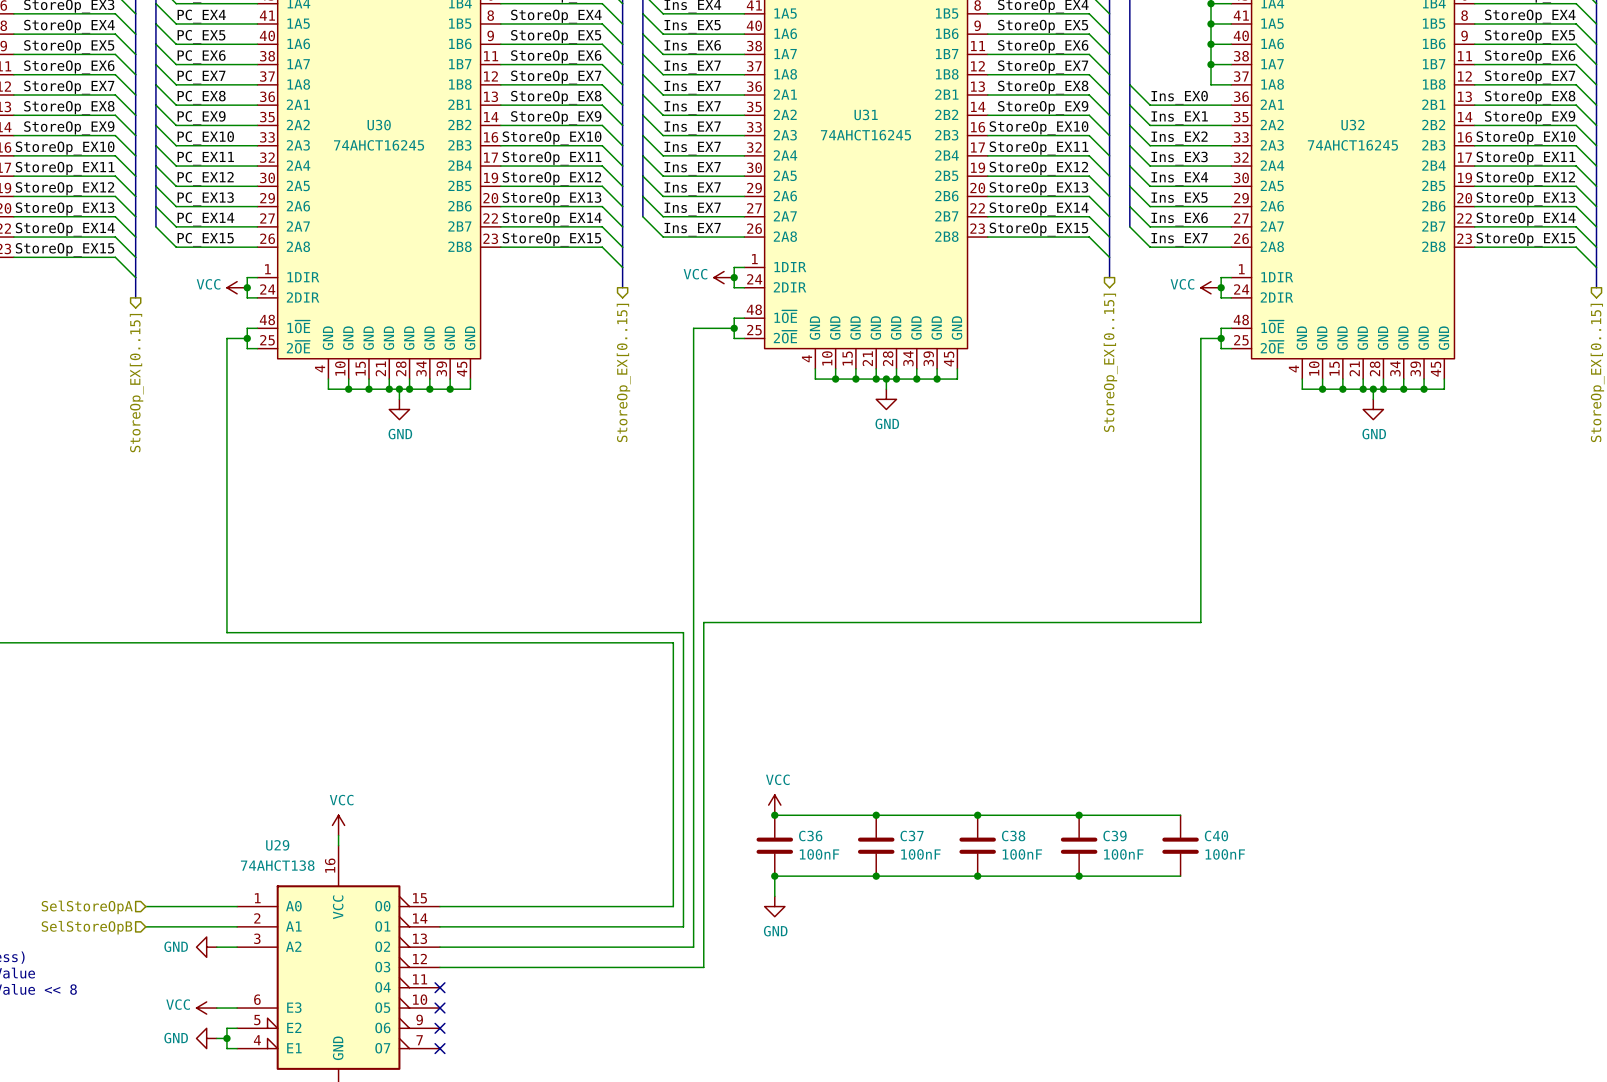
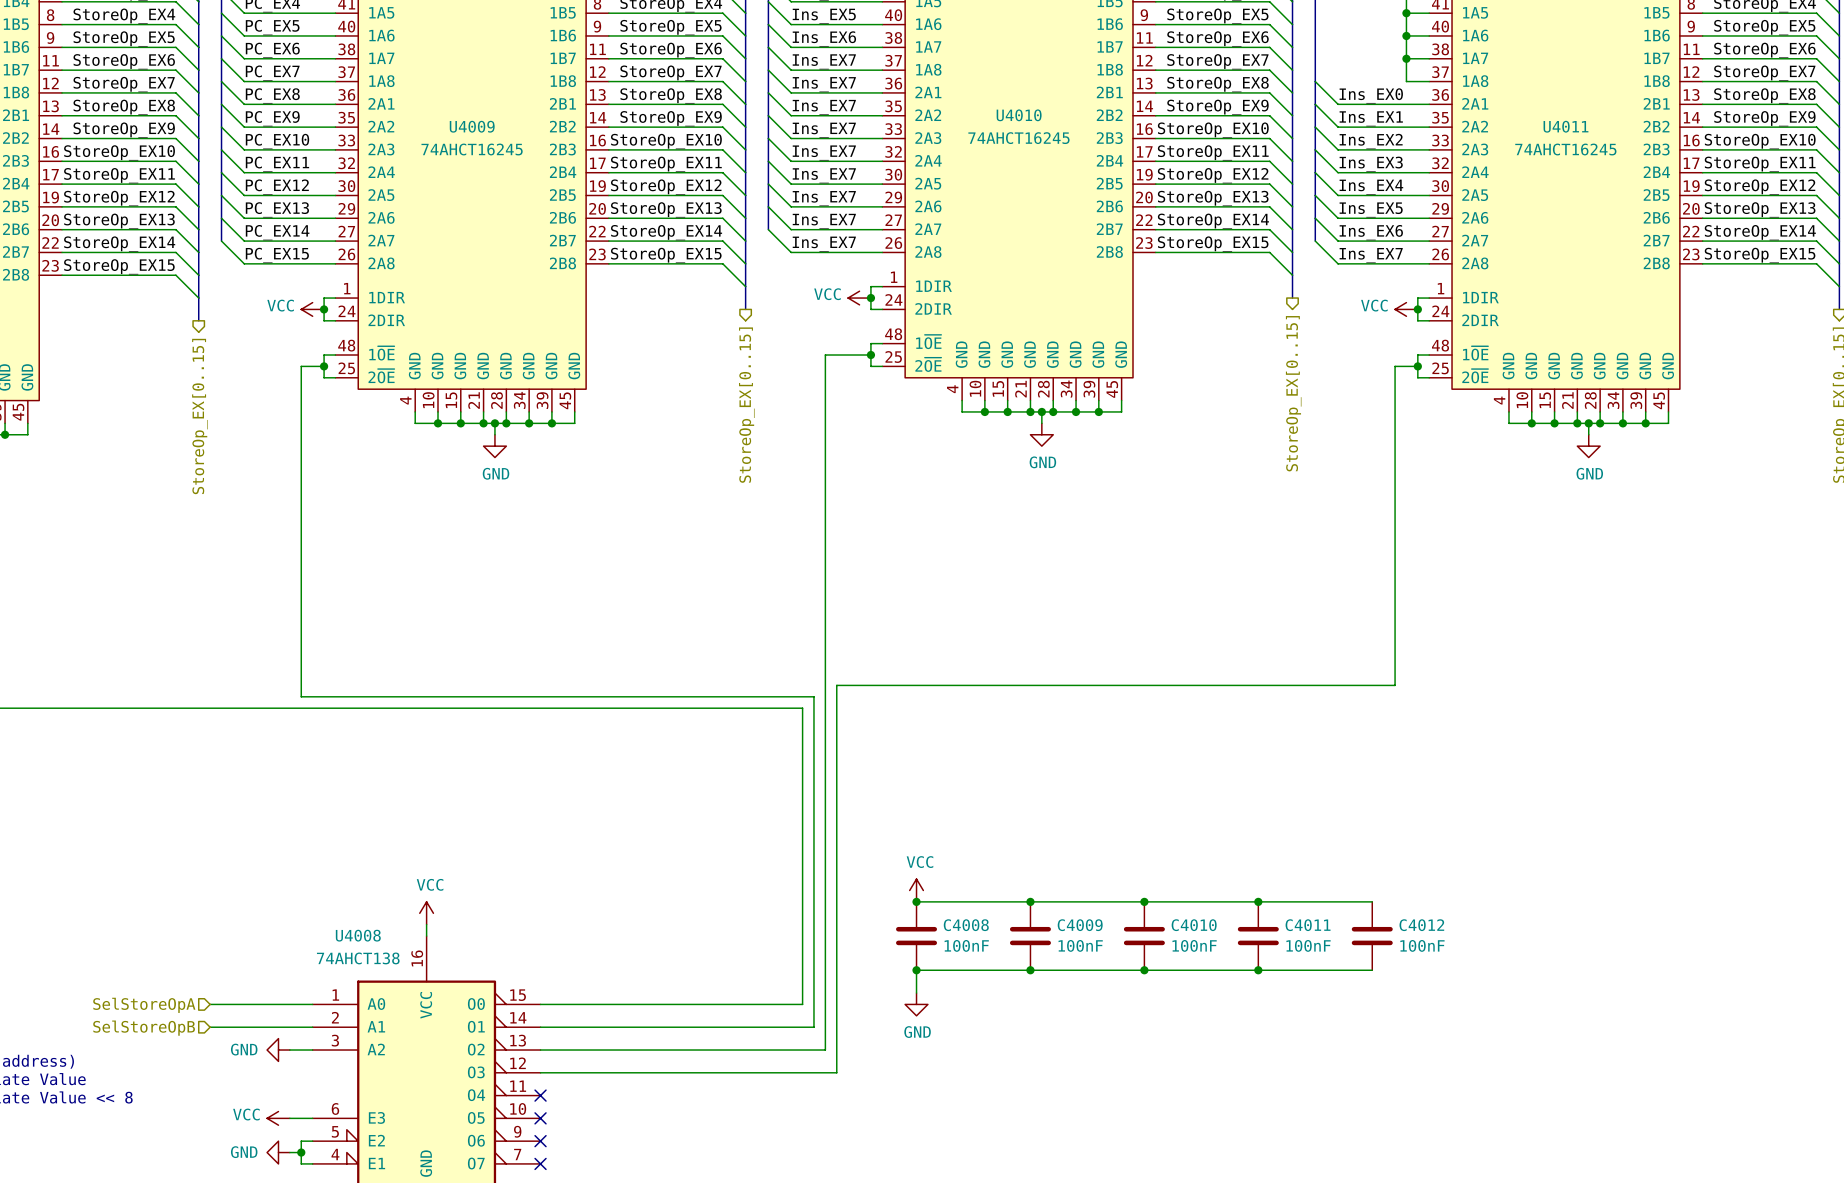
U31 name: U31 (866, 114) -> U4010 (1019, 115)
U30 name: U30 (379, 125) -> U4009 (472, 126)
U32 name: U32 (1352, 125) -> U4011 (1565, 126)
C36 name: C36 (810, 836) -> C4008 (966, 925)
C37 name: C37 (912, 836) -> C4009 (1080, 925)
C38 name: C38 (1013, 836) -> C4010 (1194, 925)
C39 name: C39 (1115, 836) -> C4011 (1308, 925)
C40 name: C40 (1216, 836) -> C4012 (1421, 925)
U29 name: U29 (277, 845) -> U4008 (358, 935)

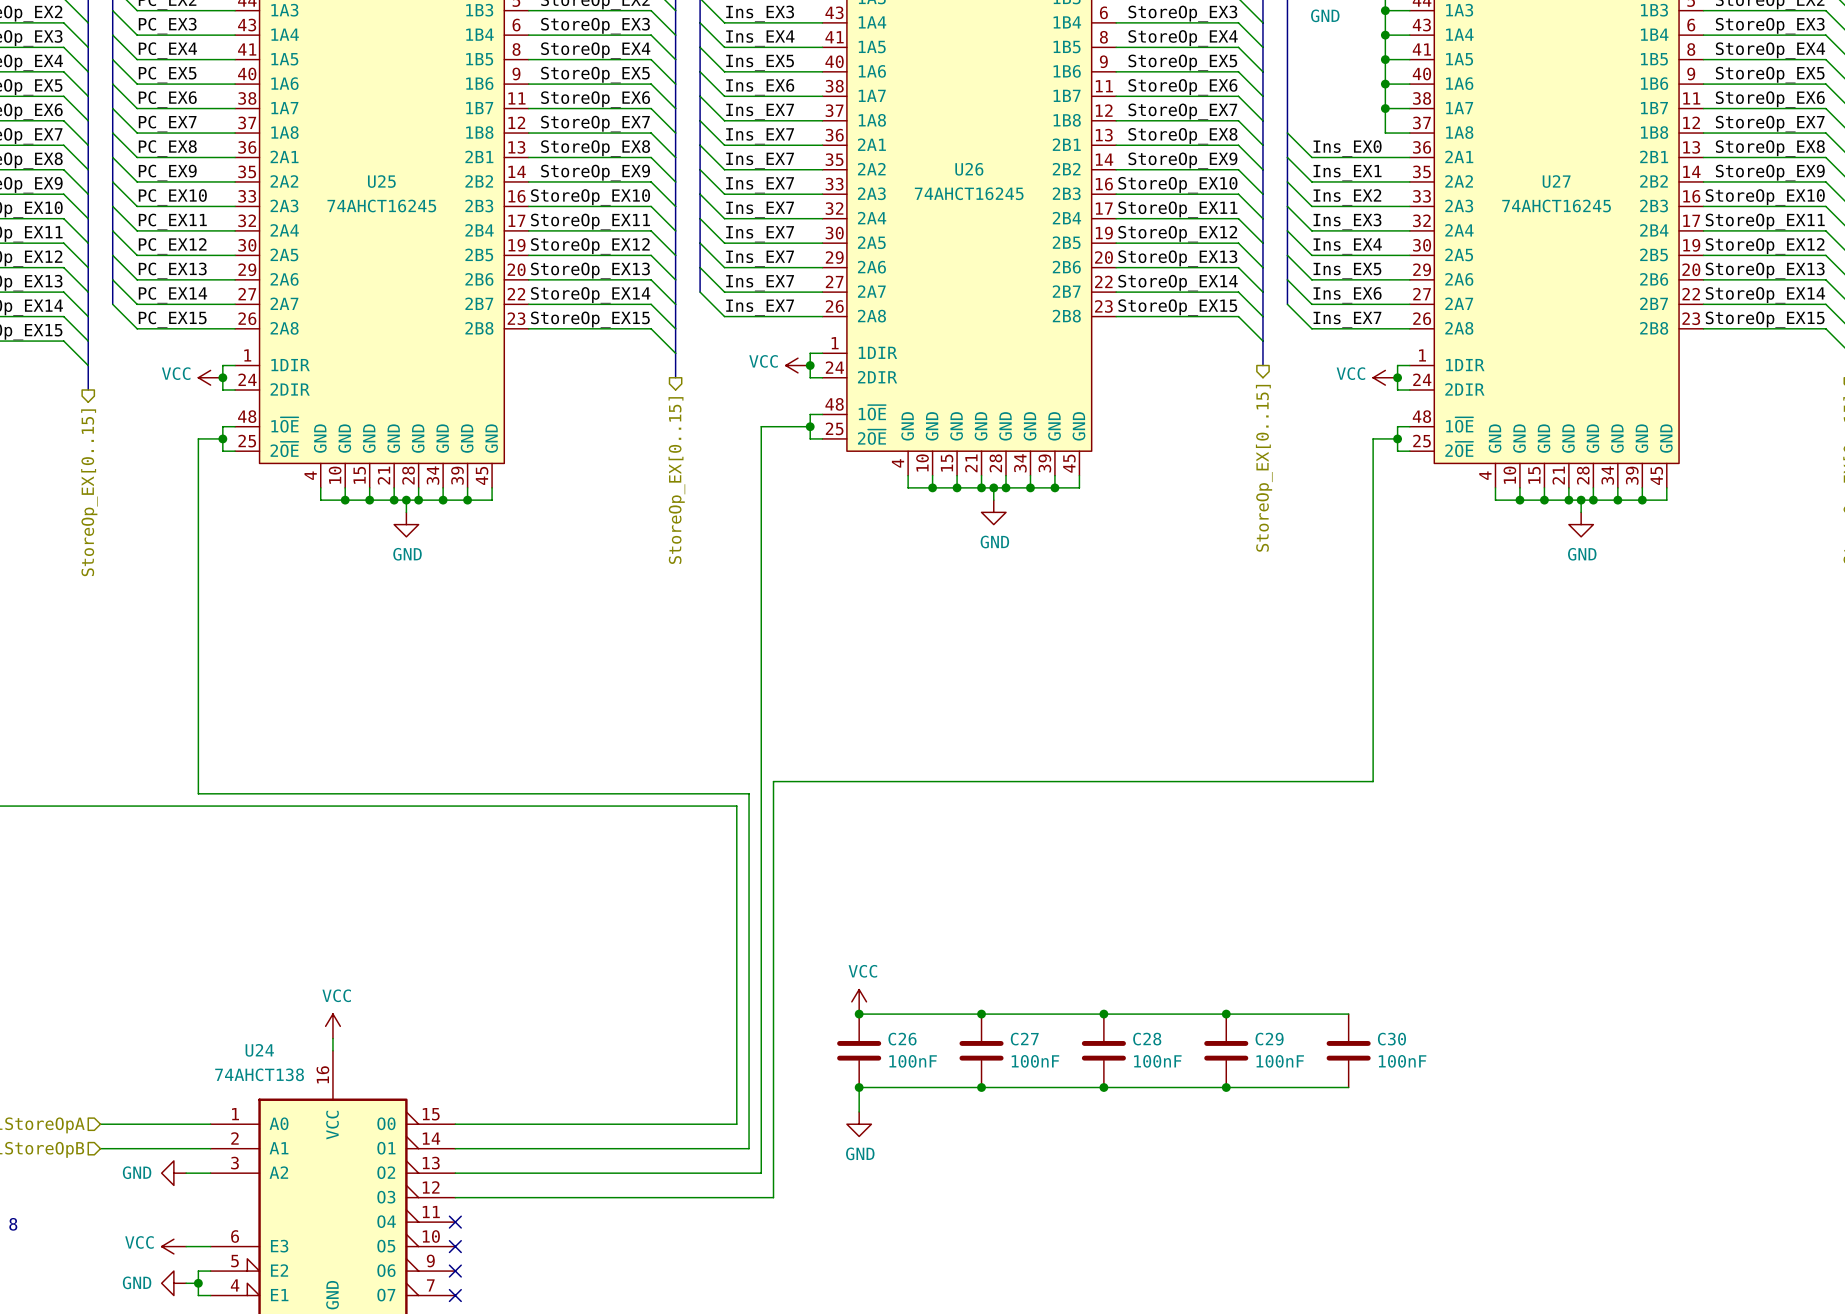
U4010 name: U4010 (1019, 115) -> U26 (969, 169)
U4009 name: U4009 (472, 126) -> U25 (381, 181)
U4011 name: U4011 (1565, 126) -> U27 (1556, 181)
C4008 name: C4008 (966, 925) -> C26 (902, 1039)
C4009 name: C4009 (1080, 925) -> C27 (1024, 1039)
C4010 name: C4010 (1194, 925) -> C28 (1147, 1039)
C4011 name: C4011 (1308, 925) -> C29 (1269, 1039)
C4012 name: C4012 (1421, 925) -> C30 (1391, 1039)
U4008 name: U4008 (358, 935) -> U24 (259, 1050)

